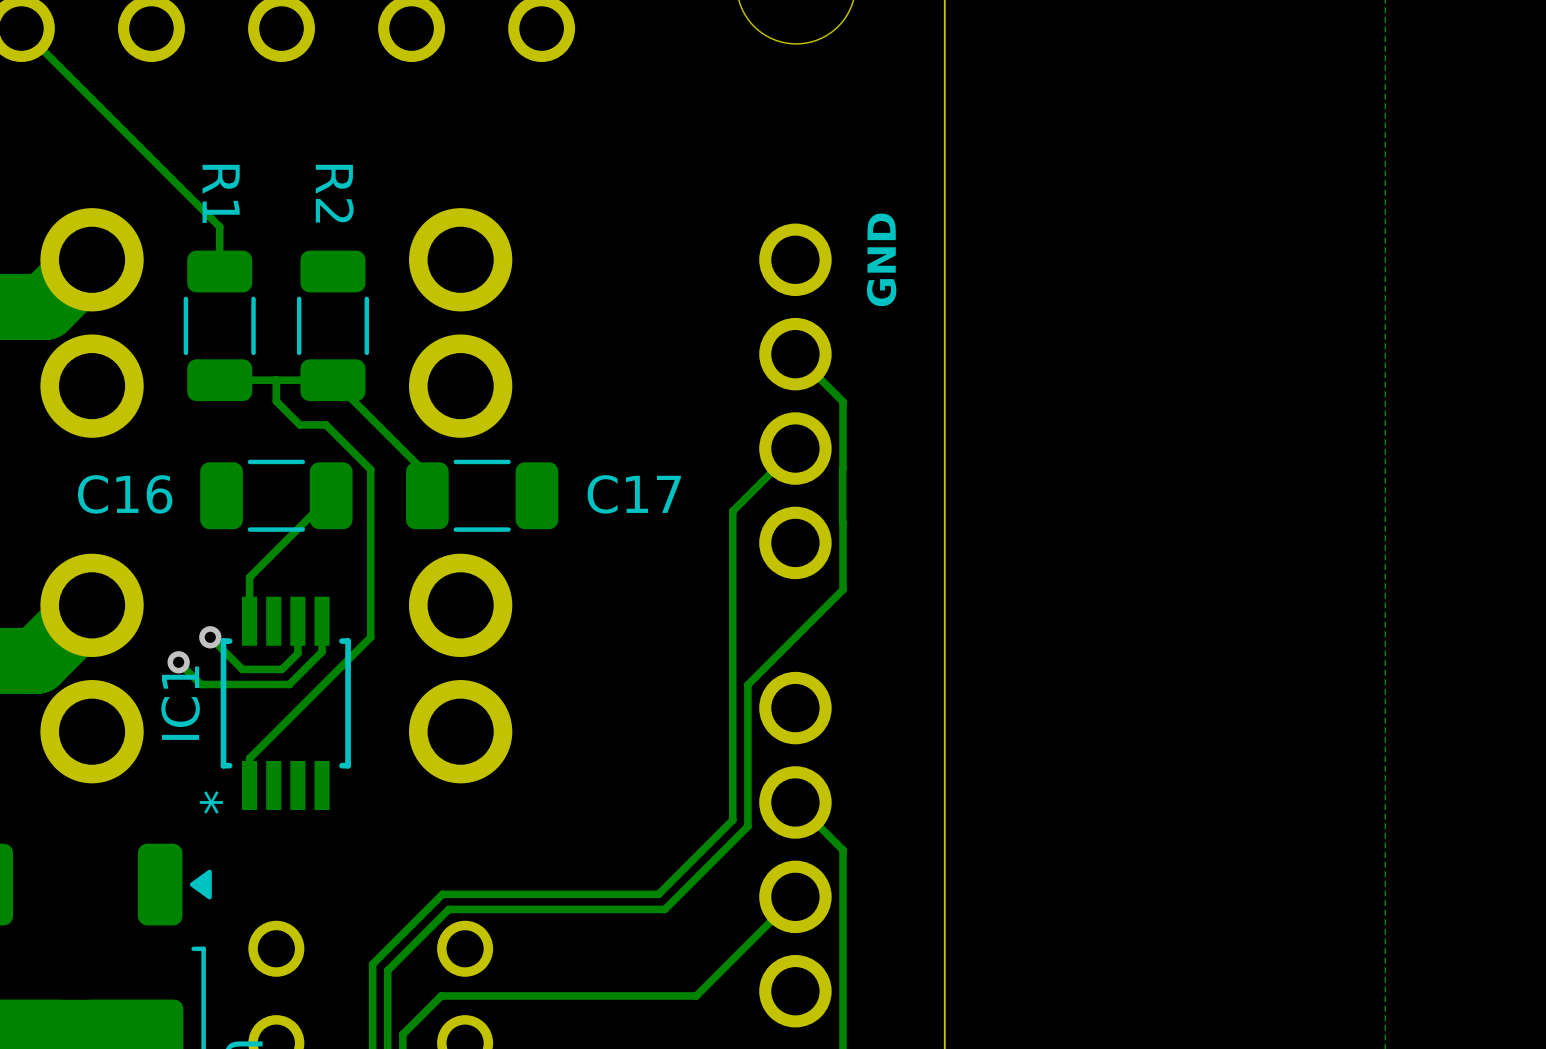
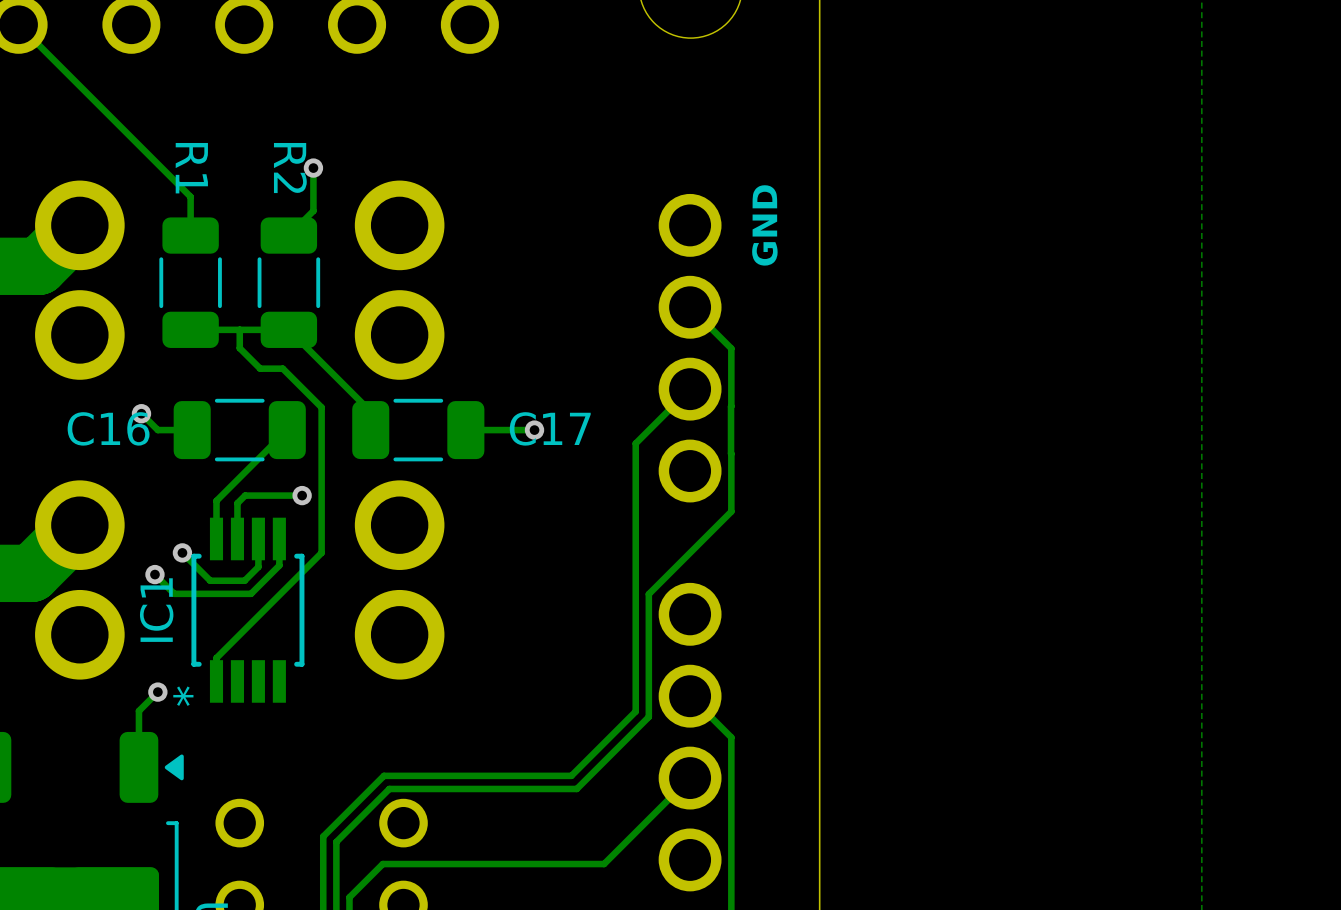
track: none -> (313, 168) (313, 210) (288, 235)
via: none -> (313, 168)
track: none -> (141, 413) (157, 430) (192, 430)
via: none -> (141, 413)
track: none -> (534, 430) (465, 430)
via: none -> (534, 430)
track: none -> (302, 495) (245, 495) (237, 503) (237, 538)
via: none -> (302, 495)
track: none -> (157, 692) (138, 711) (138, 767)
via: none -> (157, 692)

